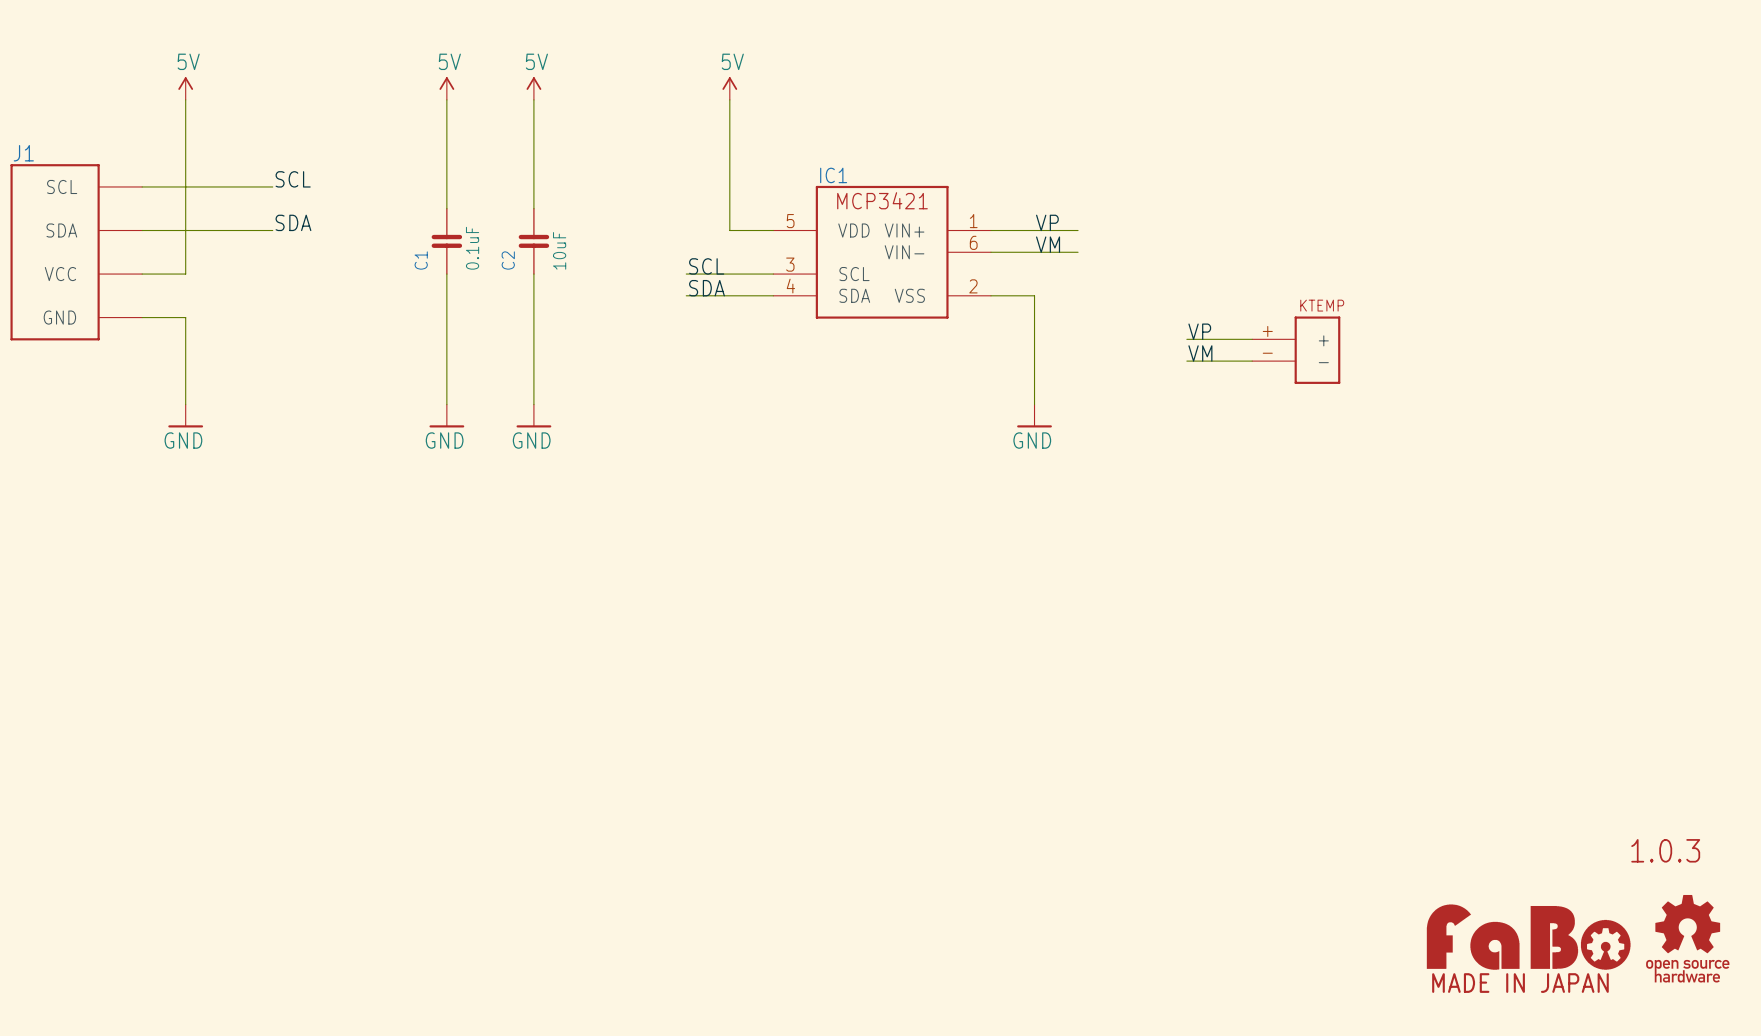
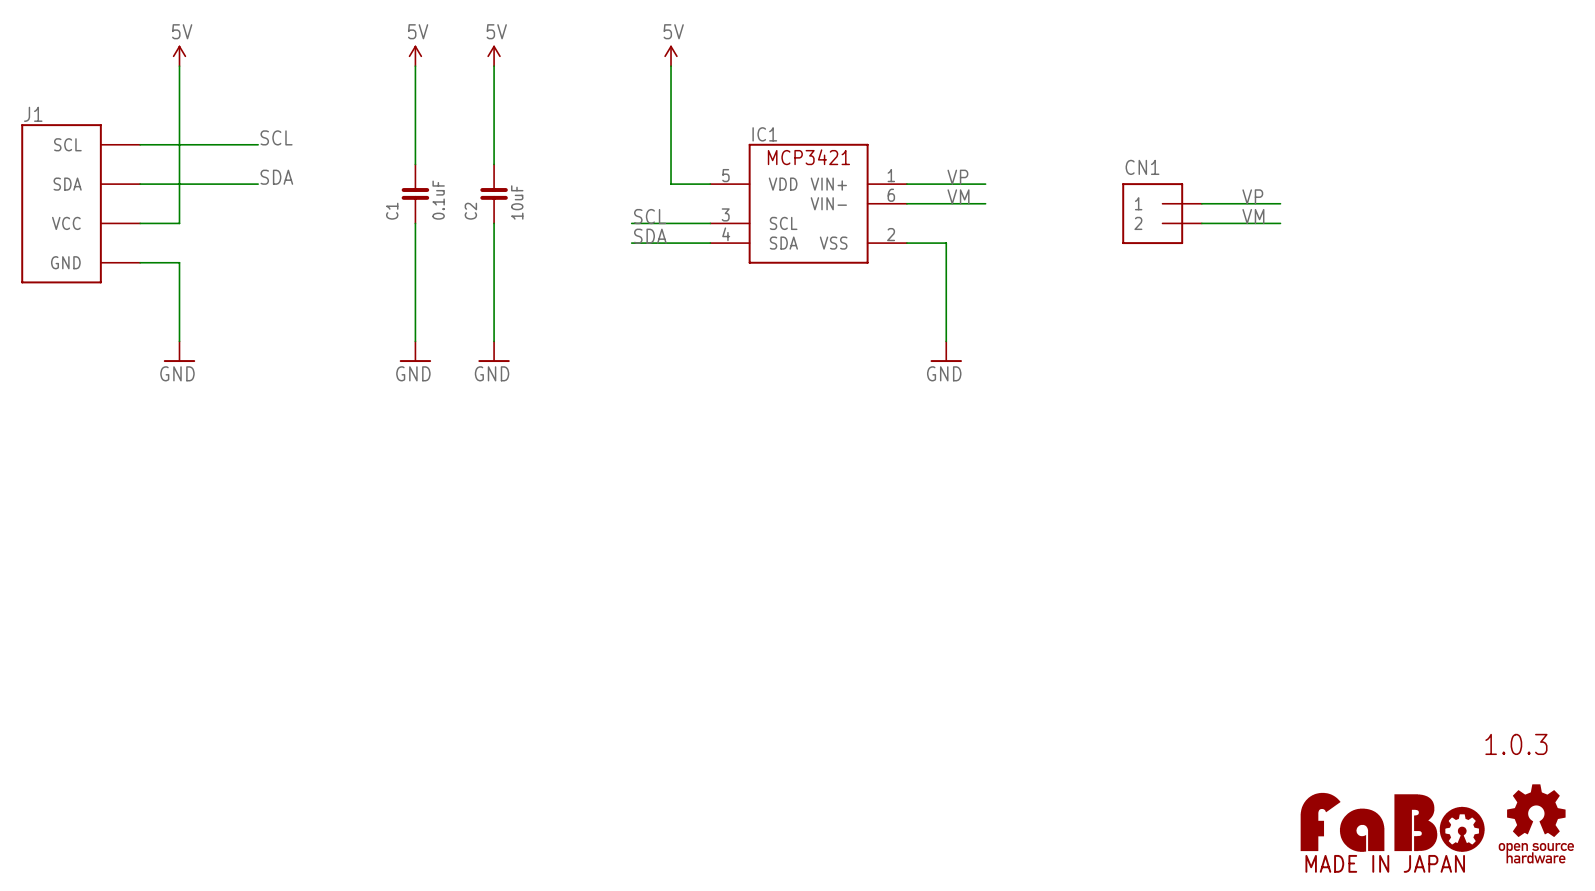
wire: none -> (1201, 203) (1280, 203)
CN1: none -> (1162, 213)
wire: none -> (1201, 223) (1280, 223)
label position: VP (1199, 331) -> VP (1252, 196)
wire: (1186, 339) (1252, 339) -> none
part: (1296, 350) -> none
label position: VM (1200, 353) -> VM (1253, 216)
wire: (1186, 361) (1252, 361) -> none

